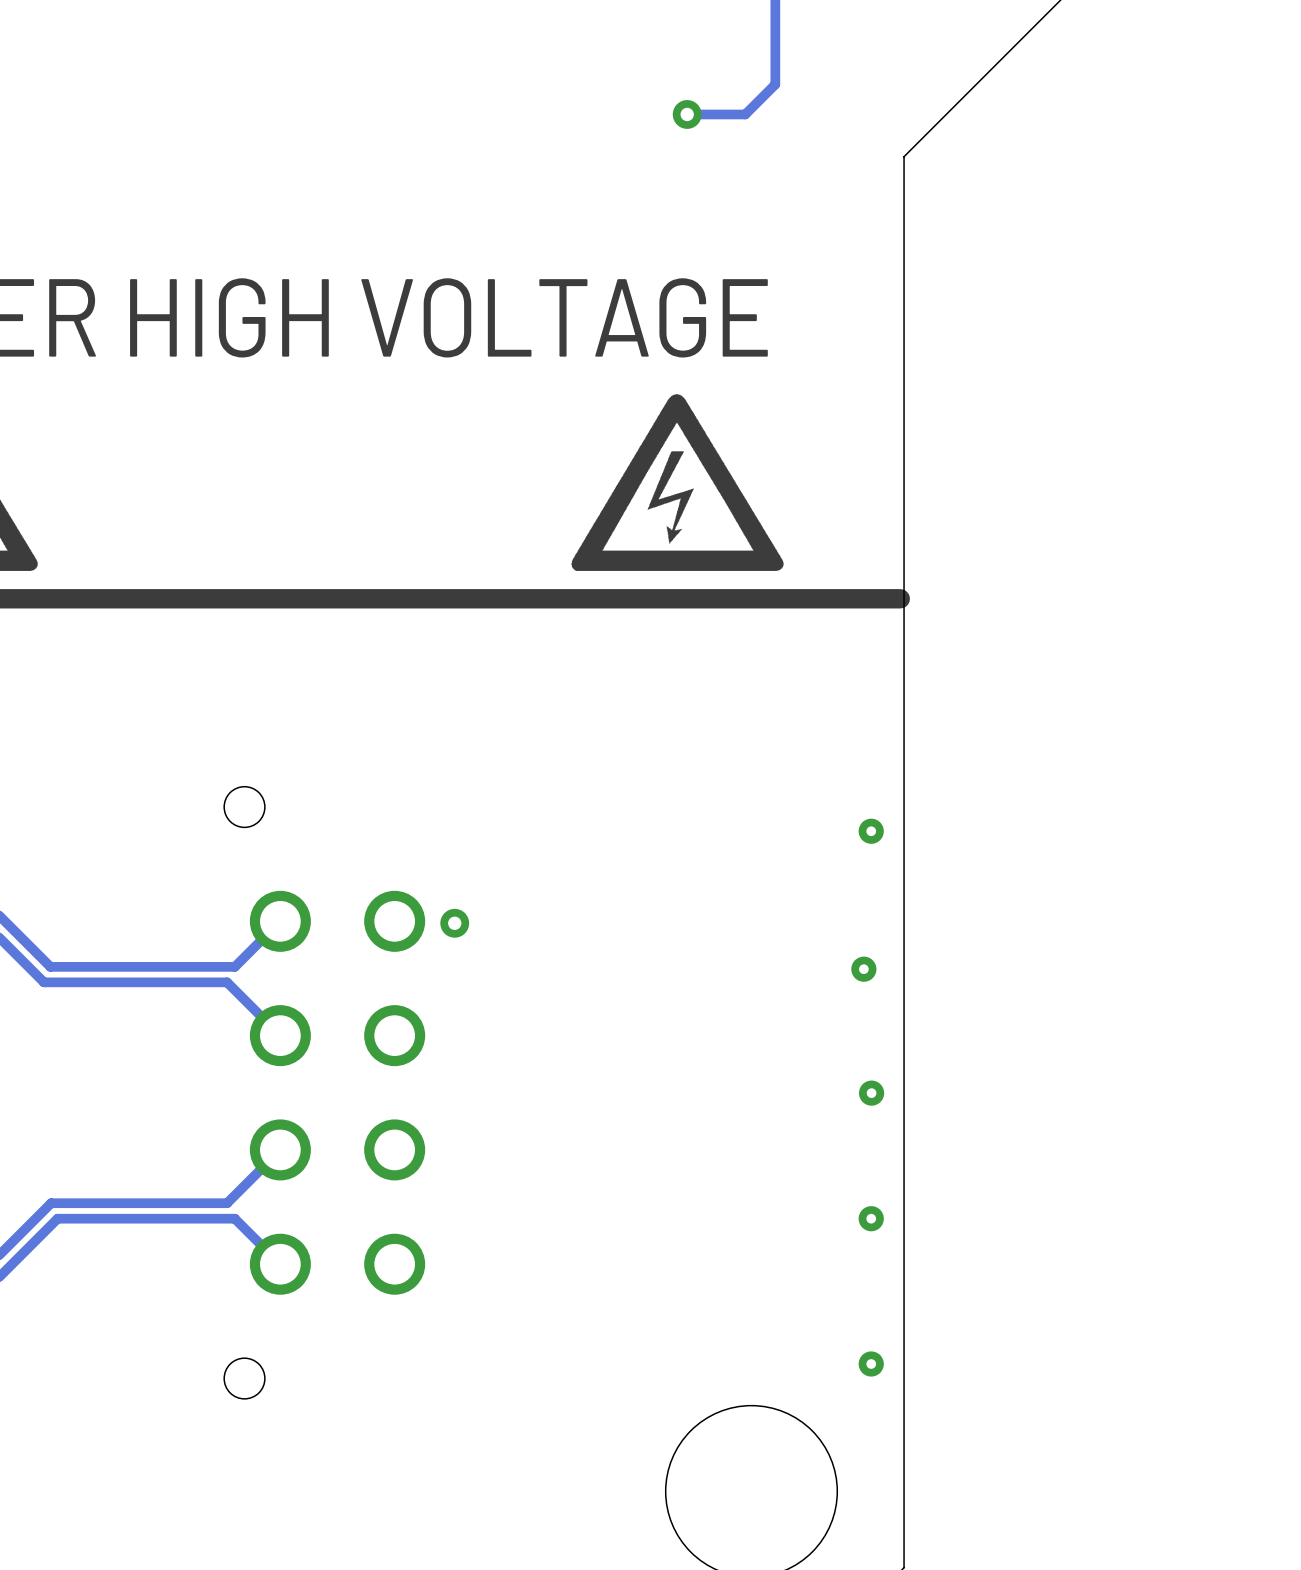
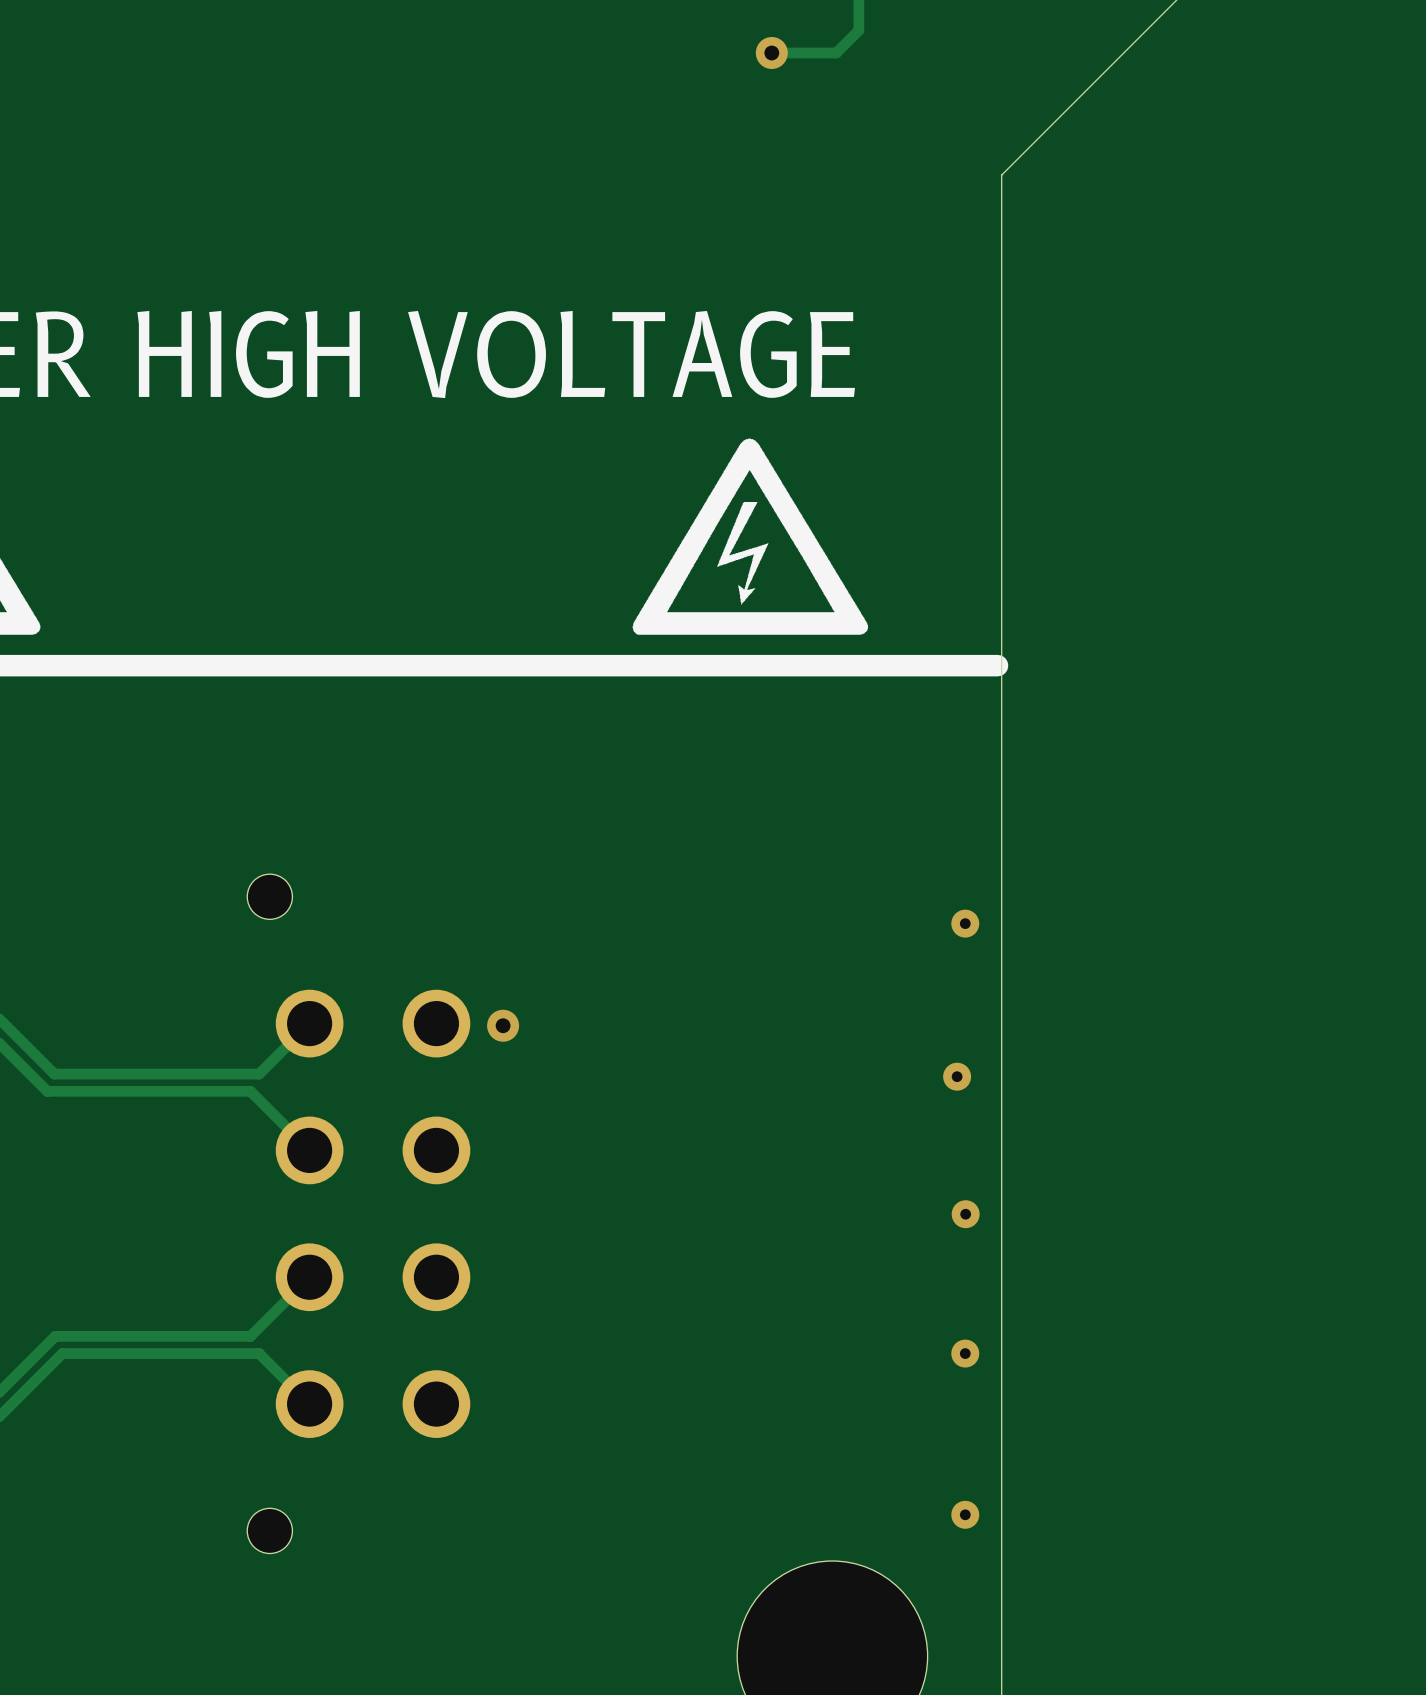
track: (775, 26) (775, 84) (745, 114) (687, 114) -> (858, 30) (836, 52) (771, 52)
via position: (687, 114) -> (771, 52)

